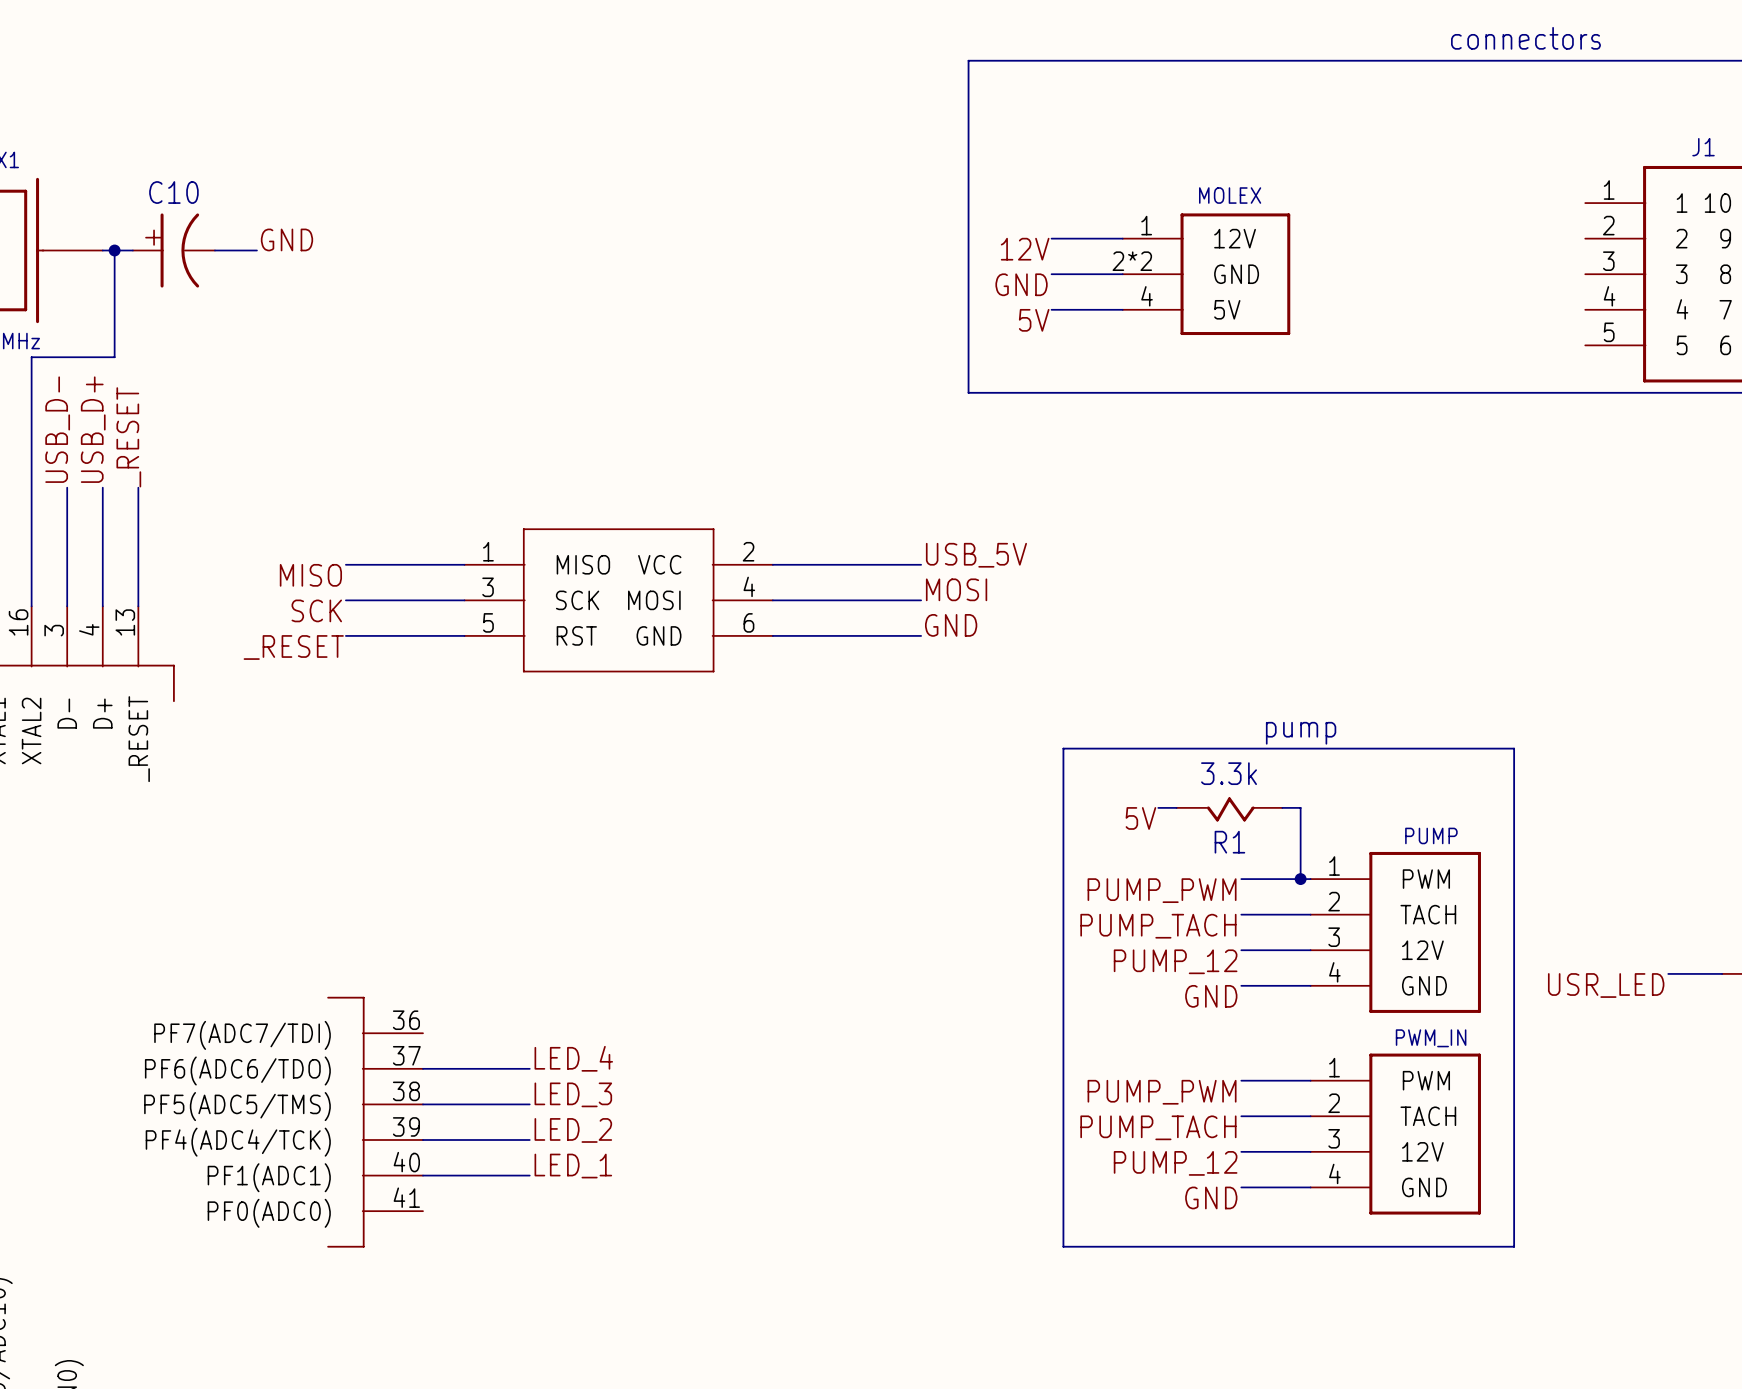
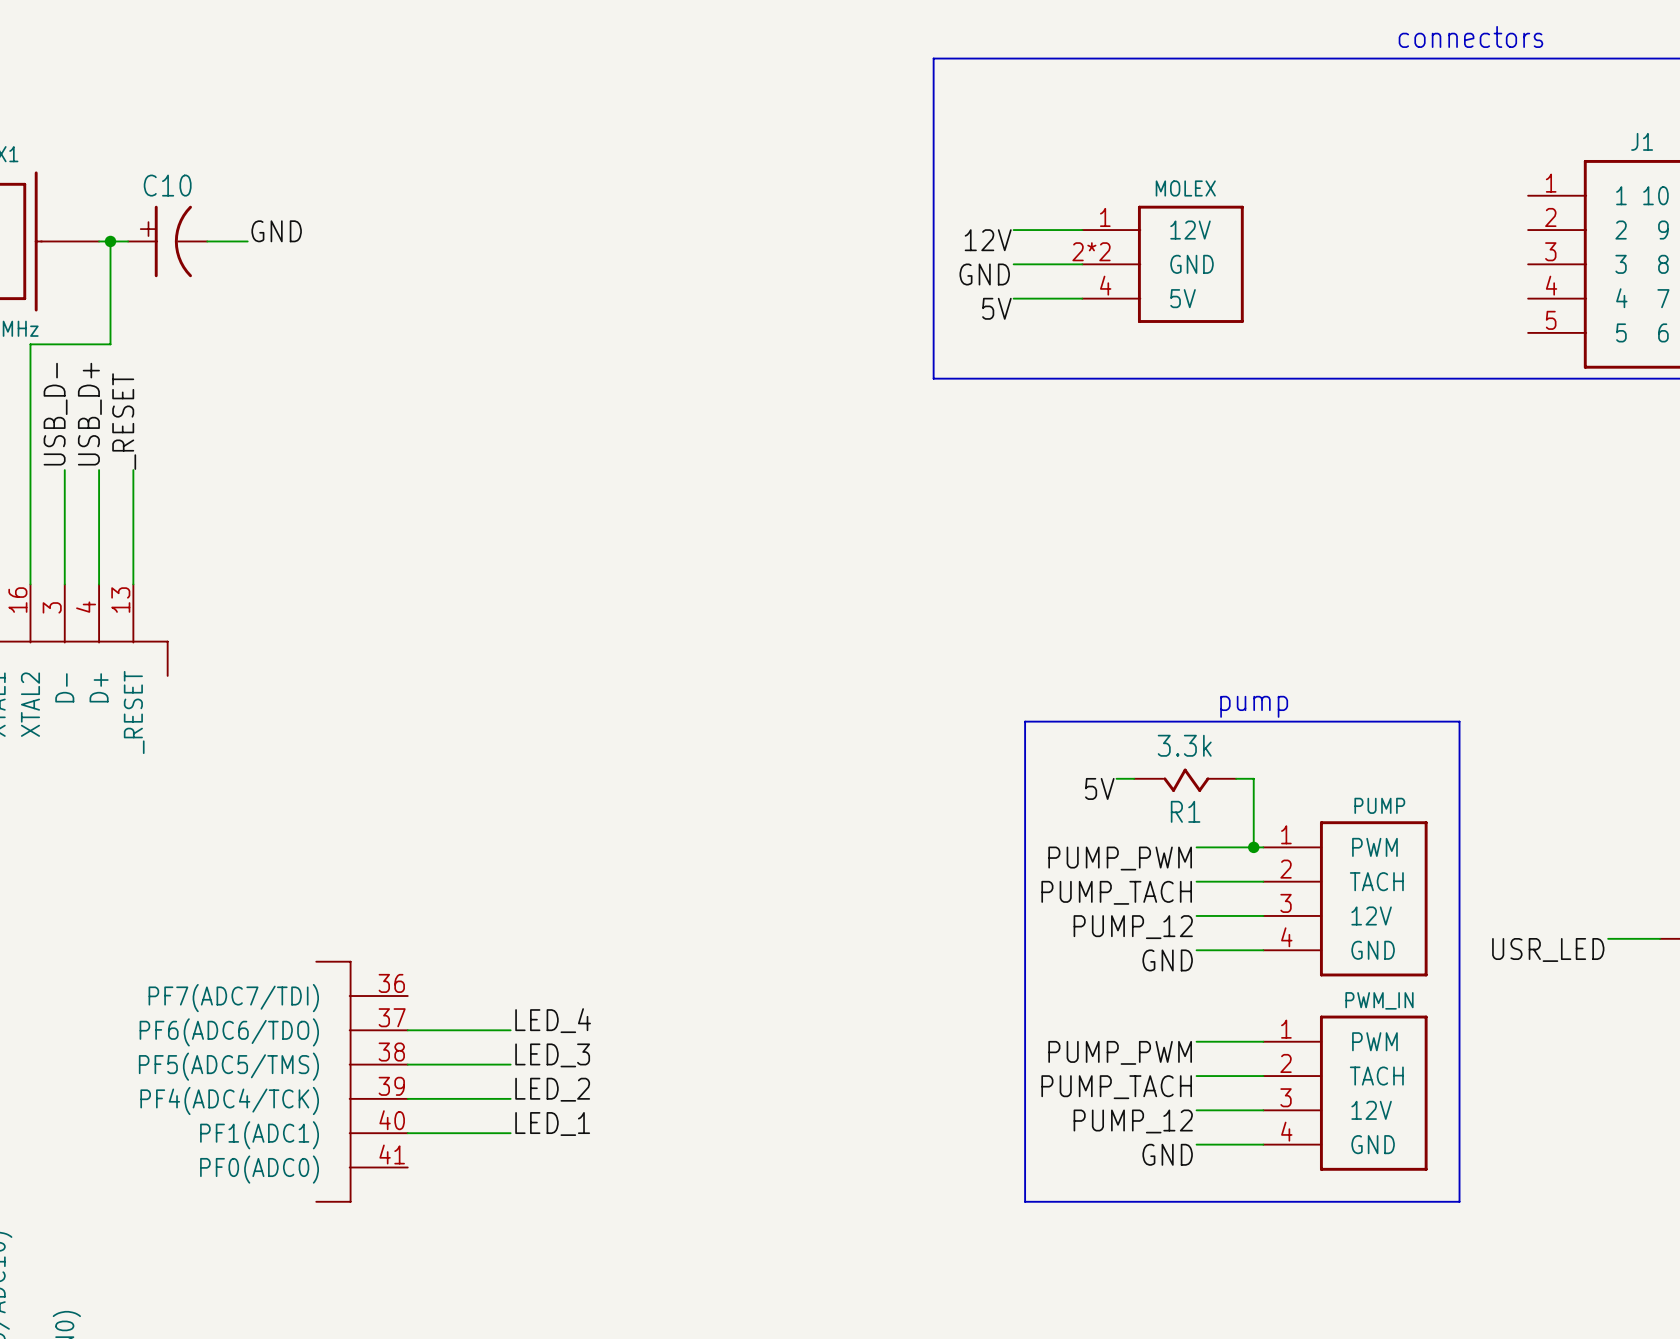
label: USB_5V (976, 555) -> none
wire: (345, 564) (464, 564) -> none
wire: (772, 564) (921, 564) -> none
label: MISO (310, 575) -> none
label: MOSI (956, 589) -> none
wire: (345, 600) (464, 600) -> none
part: (618, 600) -> none
wire: (772, 600) (921, 600) -> none
label: SCK (316, 610) -> none
label: GND (951, 625) -> none
wire: (345, 635) (464, 635) -> none
wire: (772, 635) (921, 635) -> none
label: _RESET (293, 647) -> none

